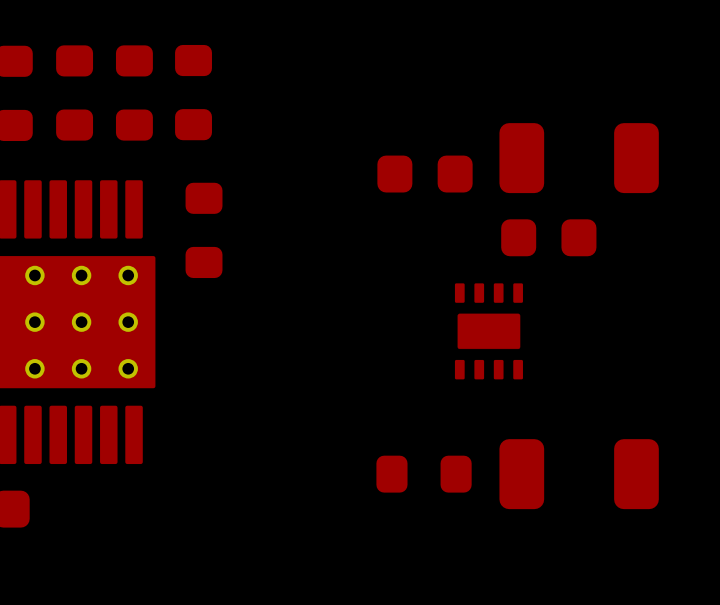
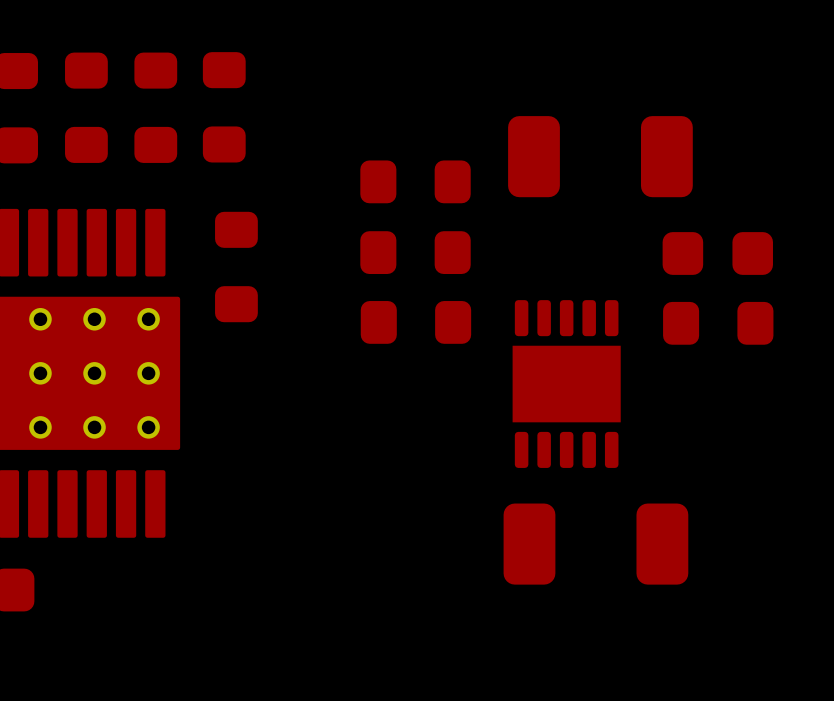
part: none -> (415, 181)
part position: (579, 158) -> (600, 156)
part: (425, 174) -> none
part: none -> (415, 252)
part position: (548, 237) -> (717, 253)
part: none -> (415, 322)
part: none -> (718, 323)
part footprint: [454, 283, 523, 380] -> [512, 300, 621, 468]
part: (424, 474) -> none
part position: (579, 474) -> (595, 544)

